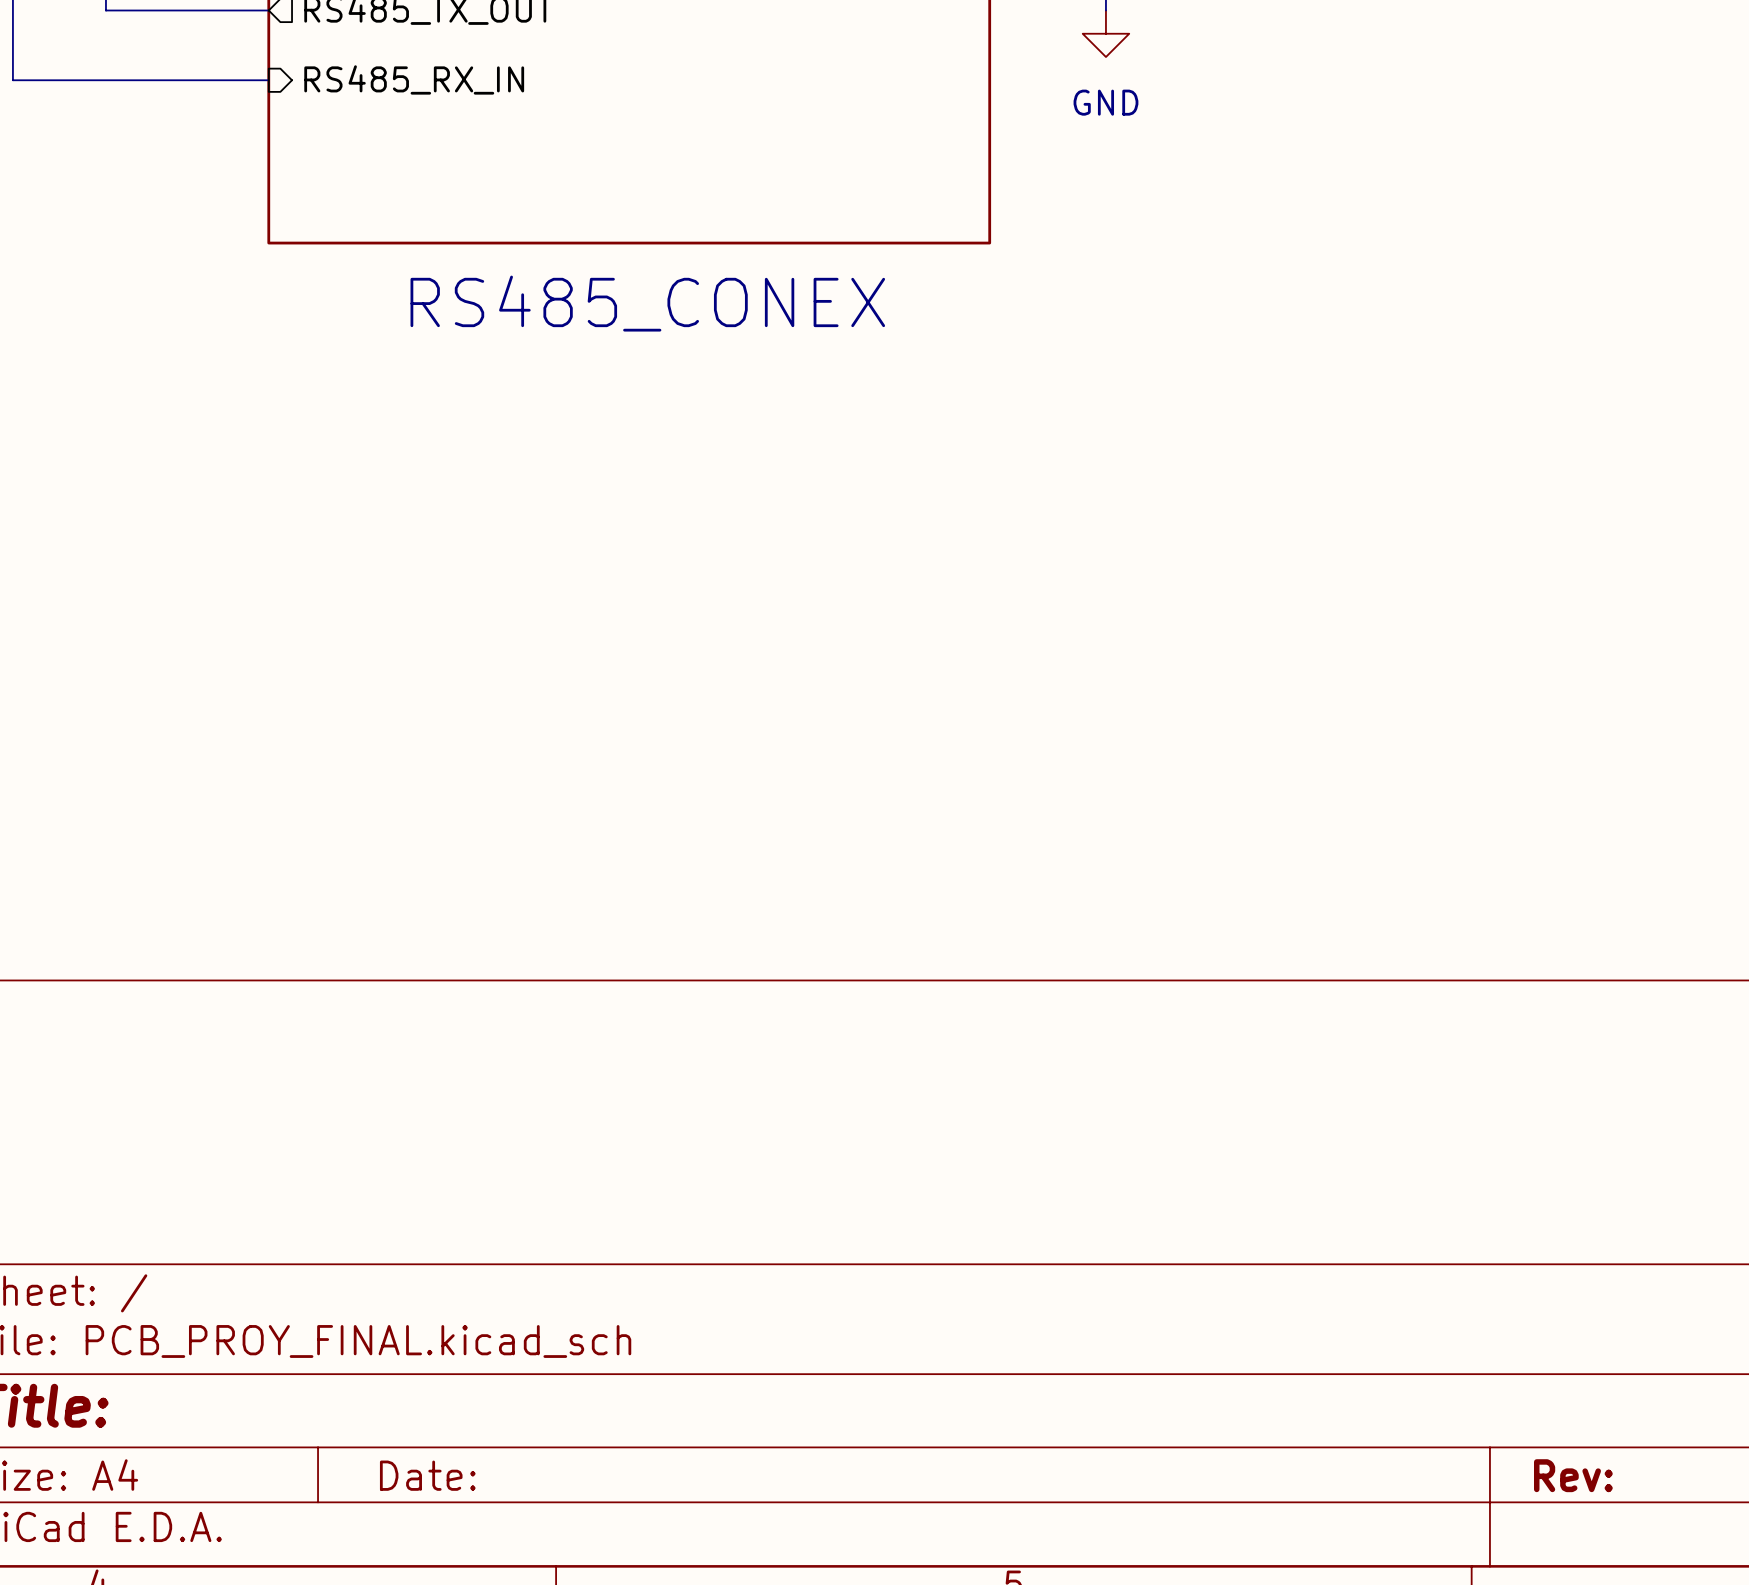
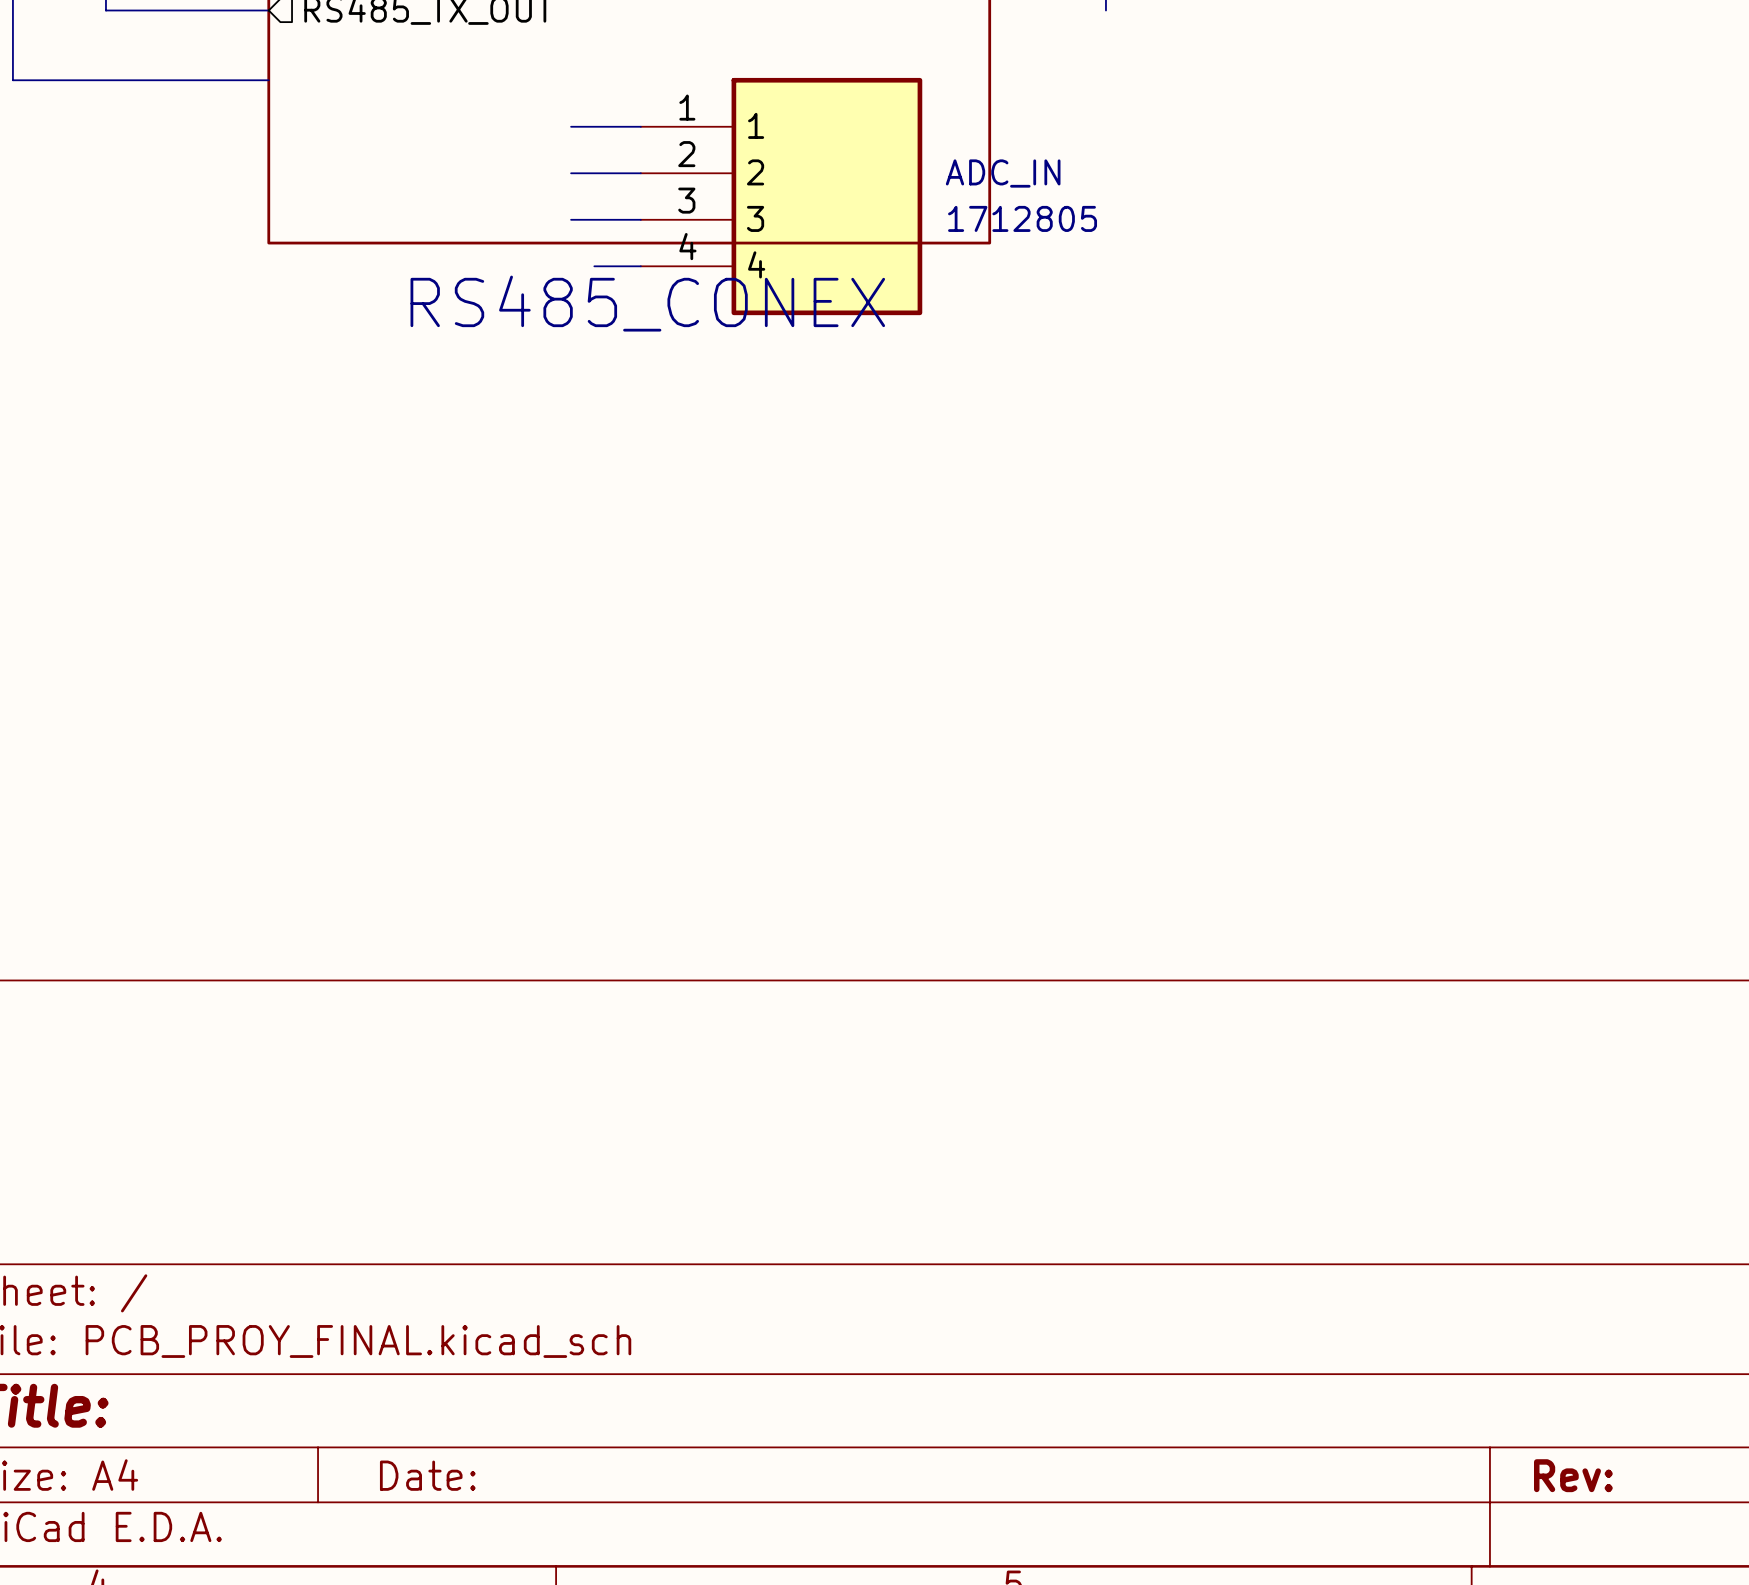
power symbol: GND (1105, 33) -> none
sheet pin: RS485_RX_IN (414, 79) -> none
wire: none -> (571, 126) (640, 126)
wire: none -> (571, 173) (640, 173)
ADC_IN: none -> 1712805 (781, 196)
wire: none -> (571, 219) (640, 219)
wire: none -> (594, 266) (640, 266)

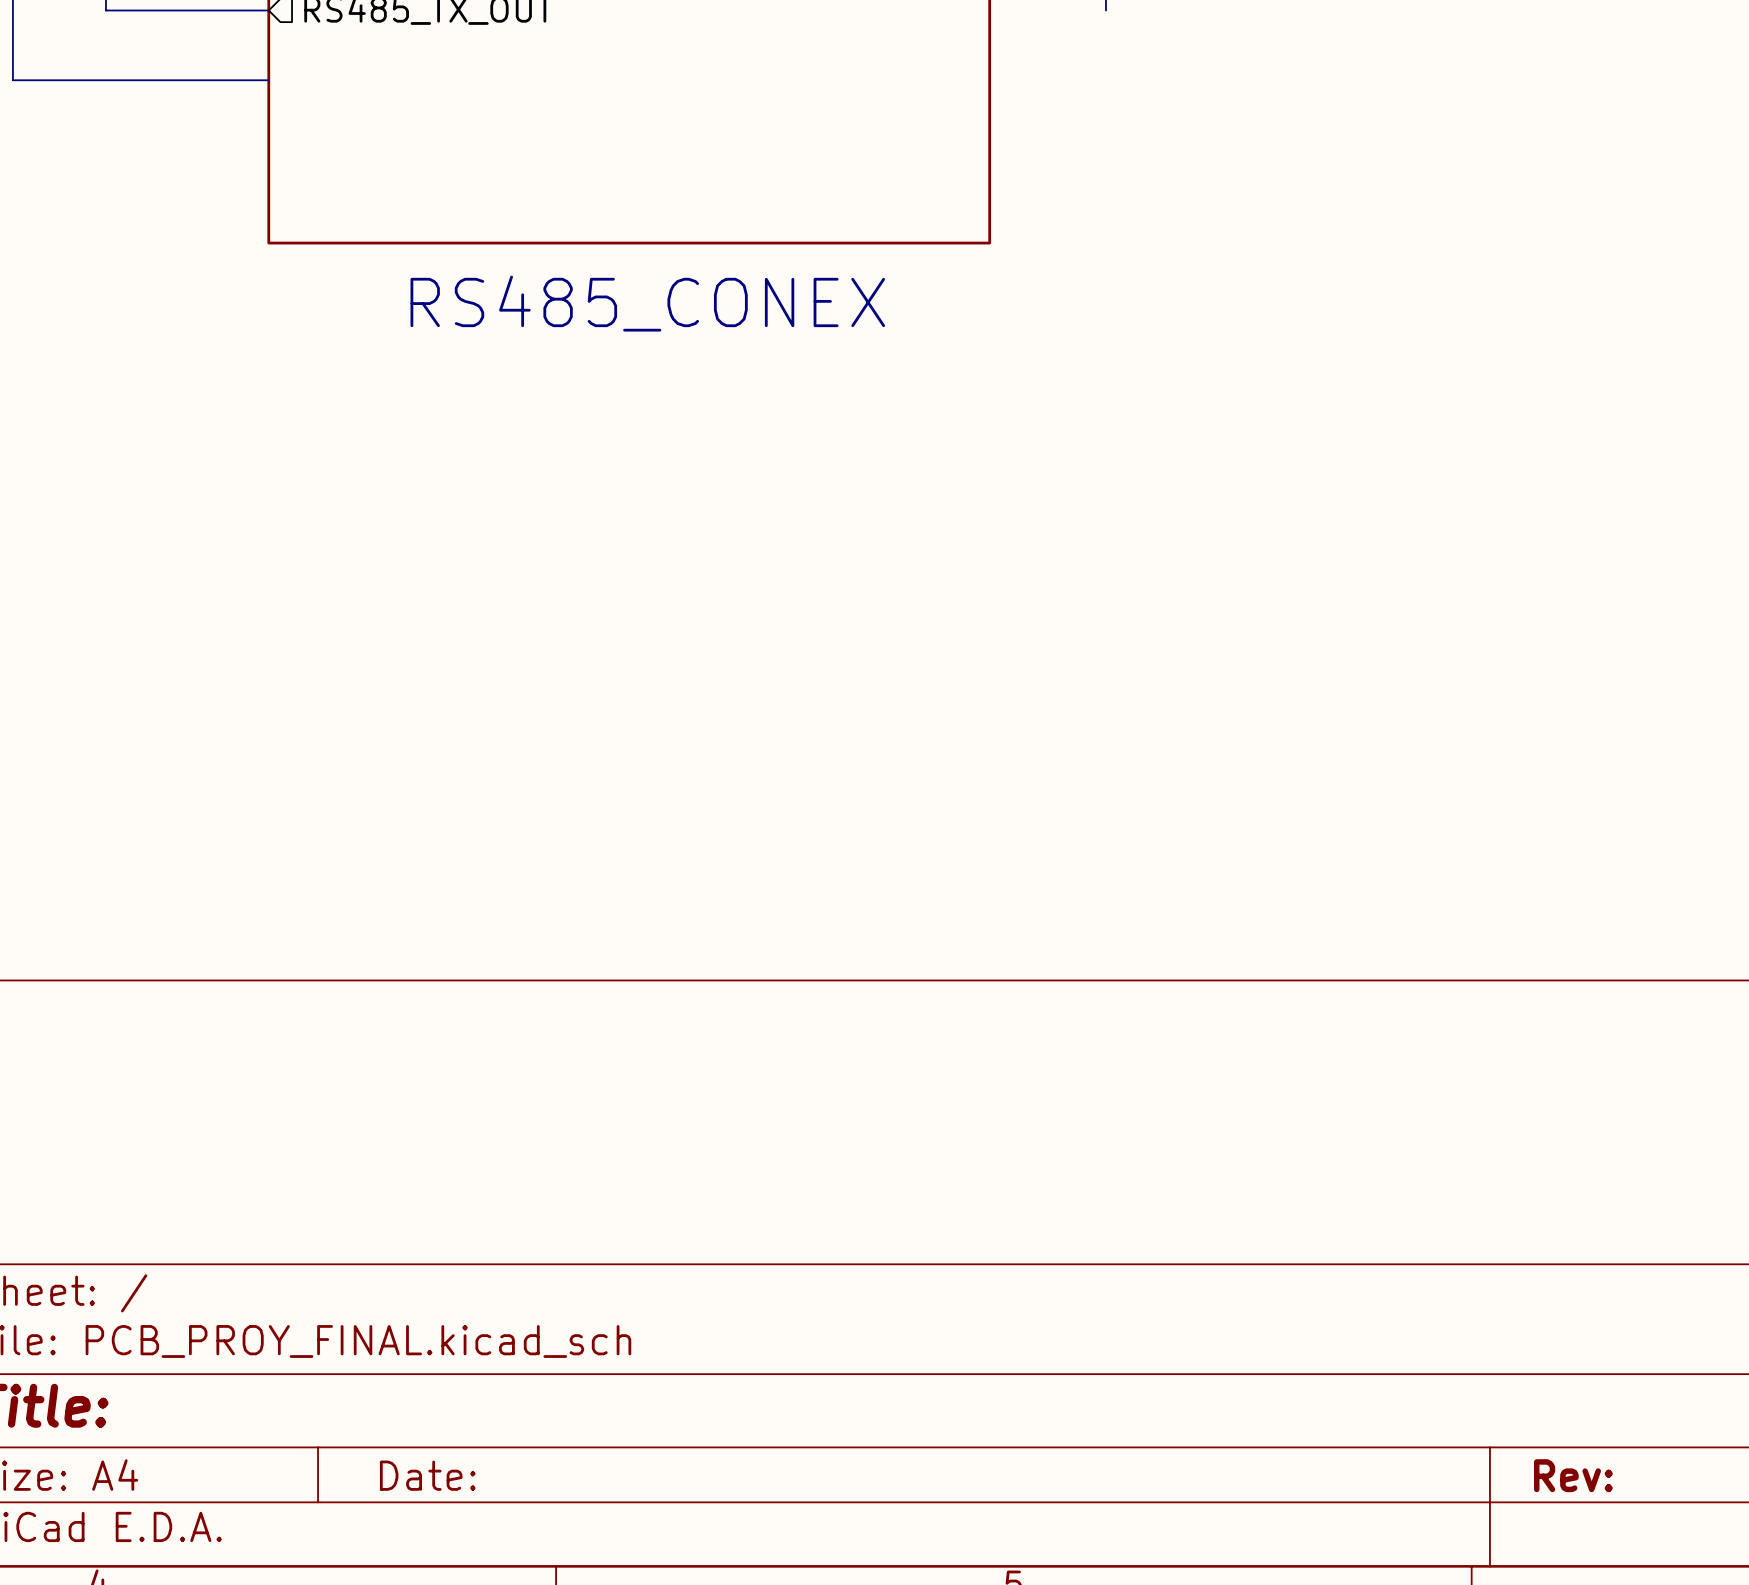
wire: (571, 126) (640, 126) -> none
wire: (571, 173) (640, 173) -> none
ADC_IN: 1712805 (781, 196) -> none
wire: (571, 219) (640, 219) -> none
wire: (594, 266) (640, 266) -> none

